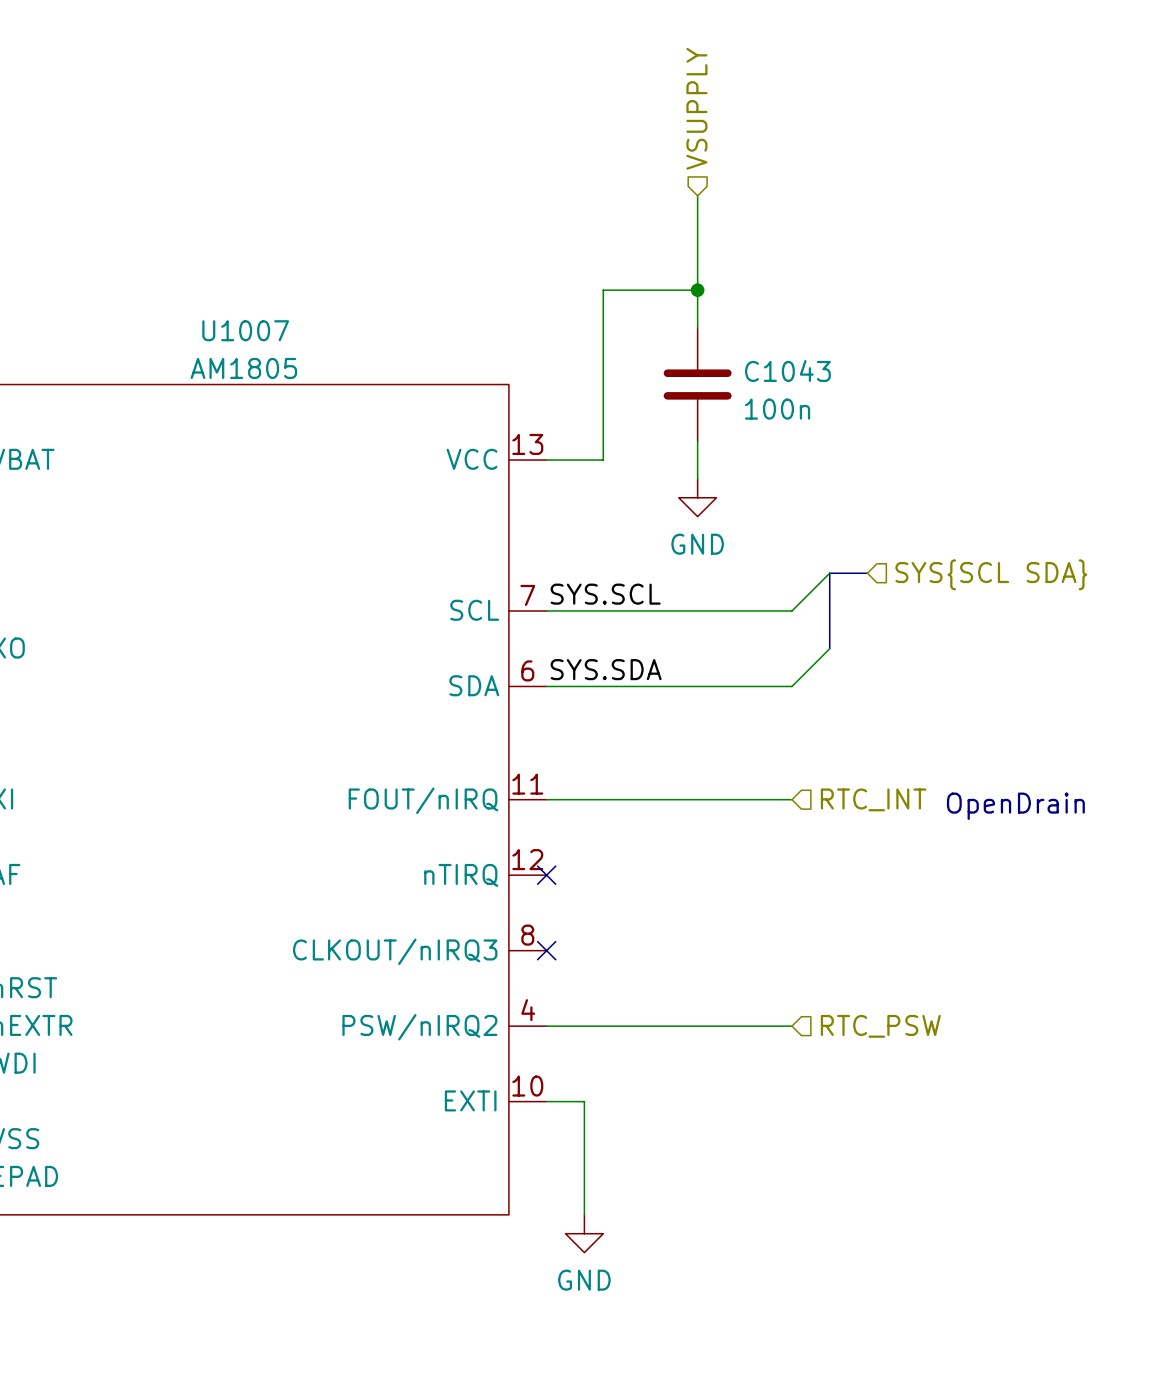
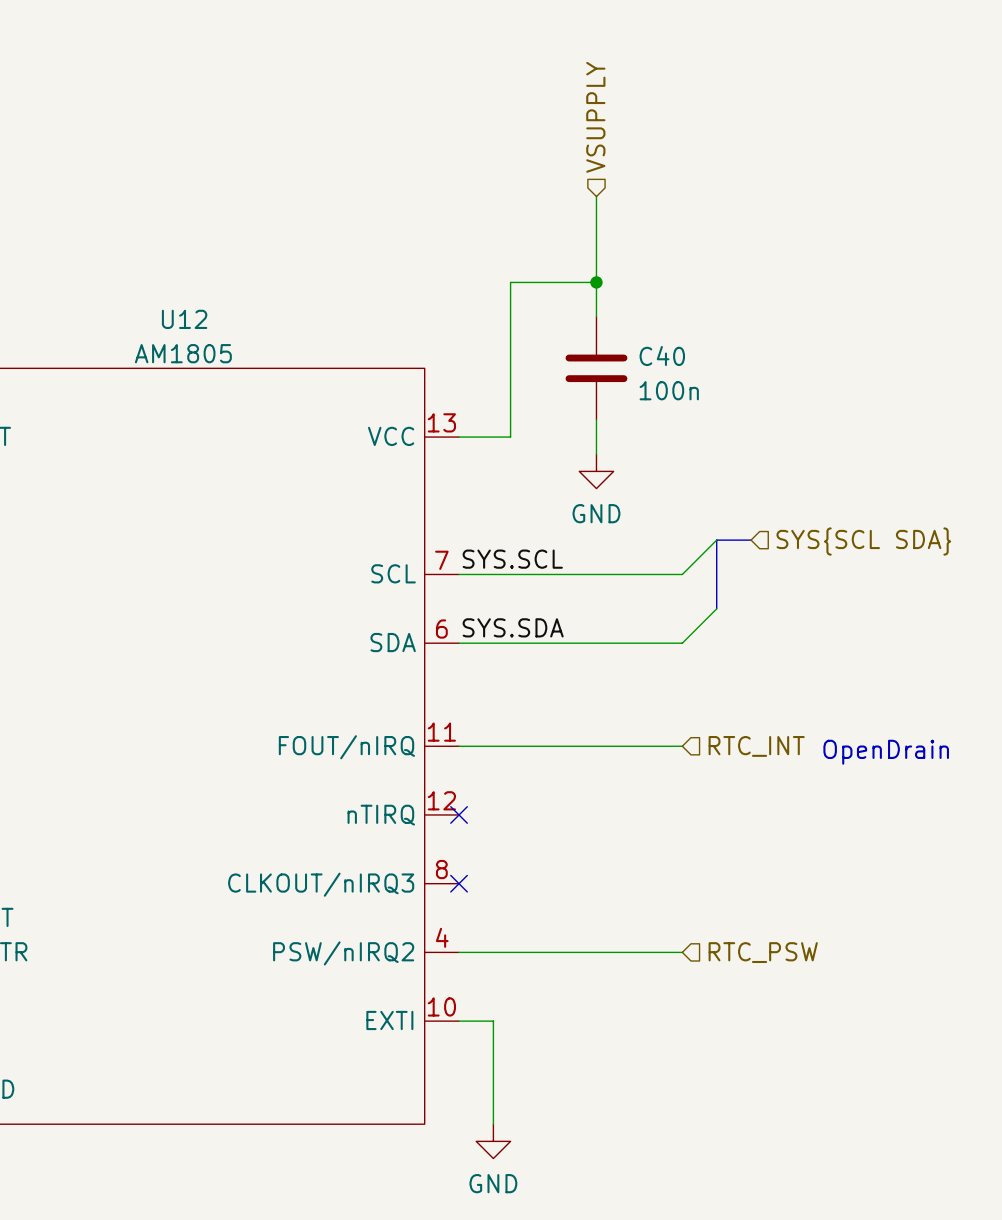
U1007 name: U1007 (245, 330) -> U12 (184, 319)
C1043 name: C1043 (787, 370) -> C40 (662, 355)

